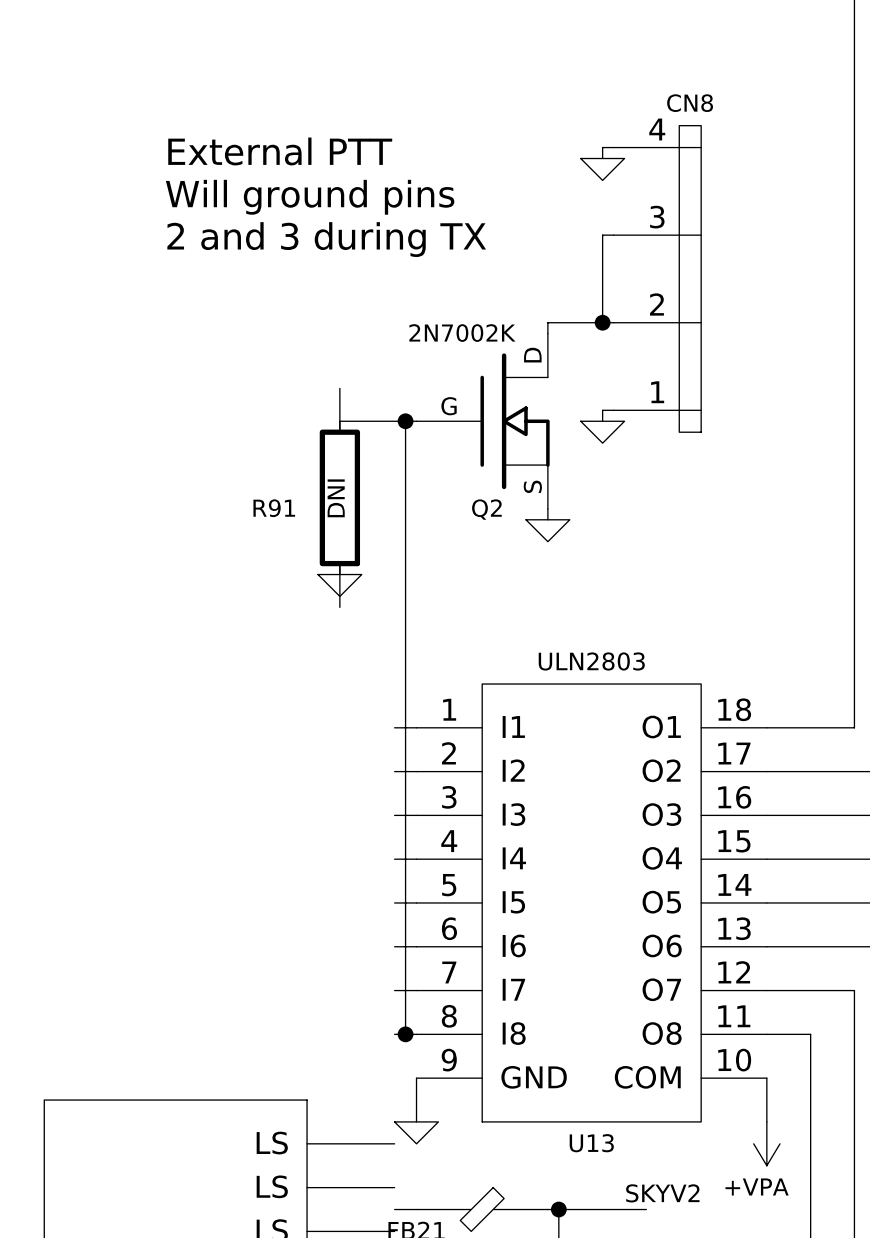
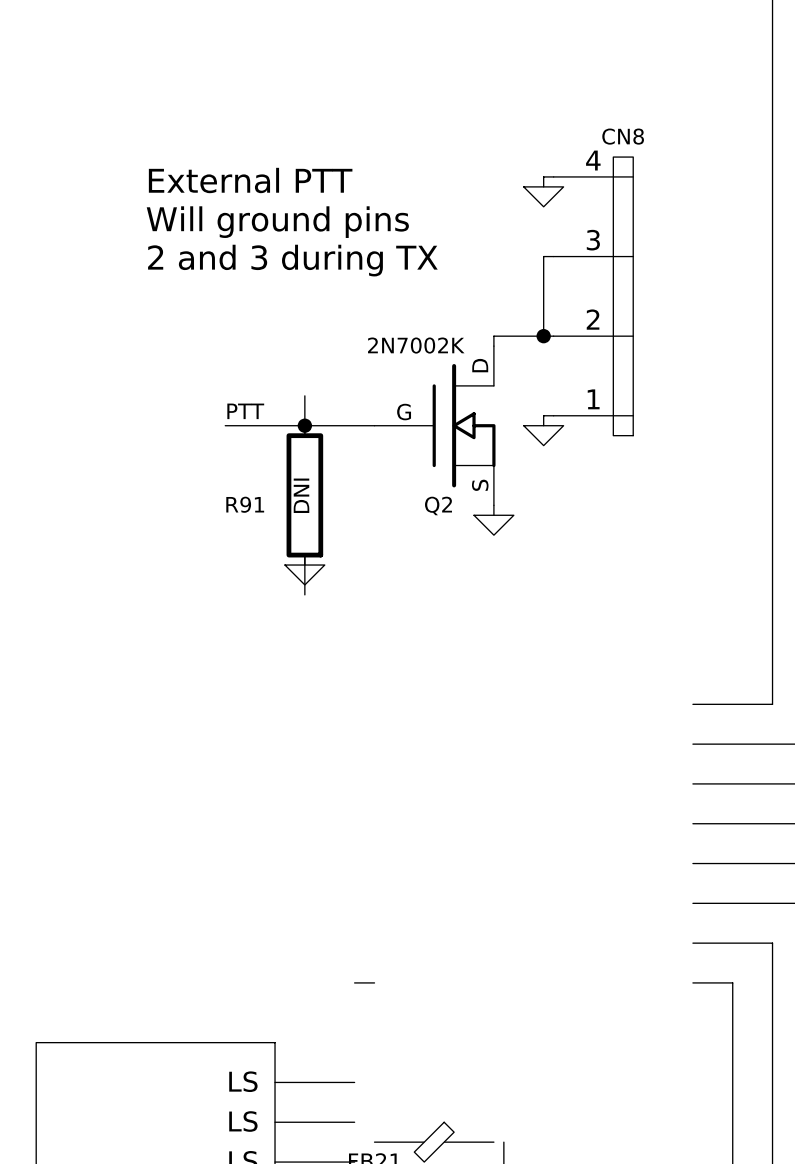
label: none -> PTT (245, 411)
wire: none -> (225, 425) (304, 425)
wire: (405, 421) (405, 1034) -> none
junction position: (405, 421) -> (304, 425)
wire: (394, 727) (416, 727) -> none
wire: (394, 771) (416, 771) -> none
wire: (394, 815) (416, 815) -> none
wire: (394, 859) (416, 859) -> none
wire: (394, 902) (416, 902) -> none
U13: ULN2803 (591, 902) -> none
wire: (394, 946) (416, 946) -> none
wire: (394, 990) (416, 990) -> none
junction: (405, 1034) -> none
wire: (416, 1078) (416, 1121) -> none
wire: (766, 1078) (766, 1121) -> none
power symbol: (416, 1132) -> none
power symbol: +VPA (766, 1143) -> none
label: SKYV2 (662, 1193) -> none
wire: (394, 1209) (416, 1209) -> none
wire: (547, 1209) (646, 1209) -> none
junction: (558, 1209) -> none

